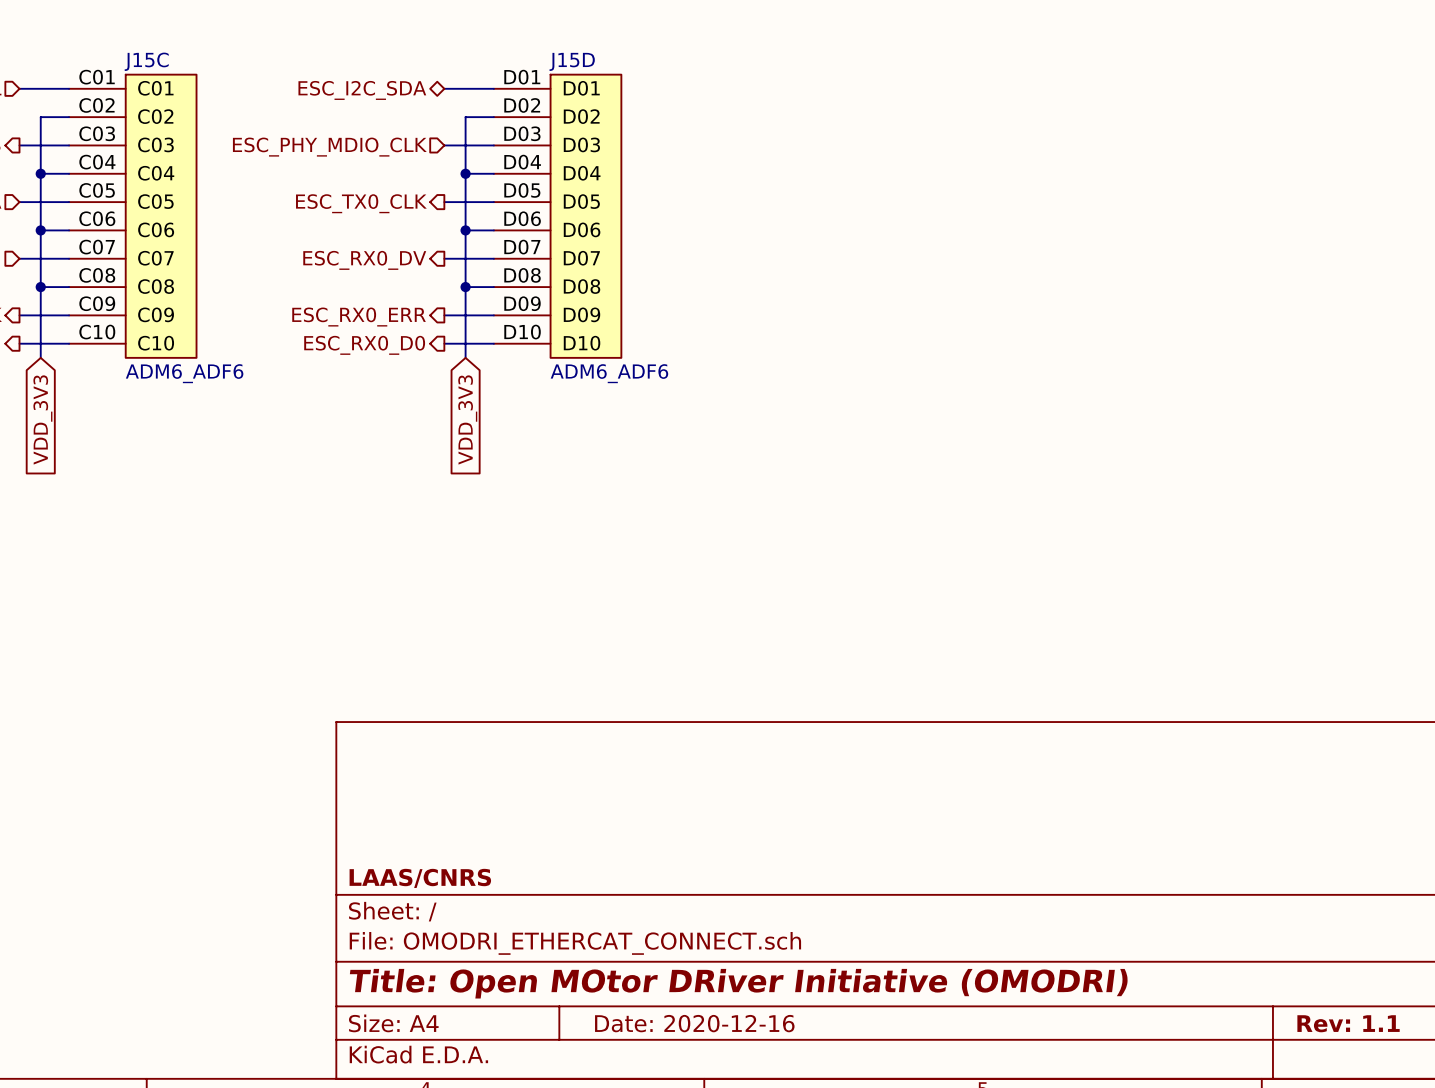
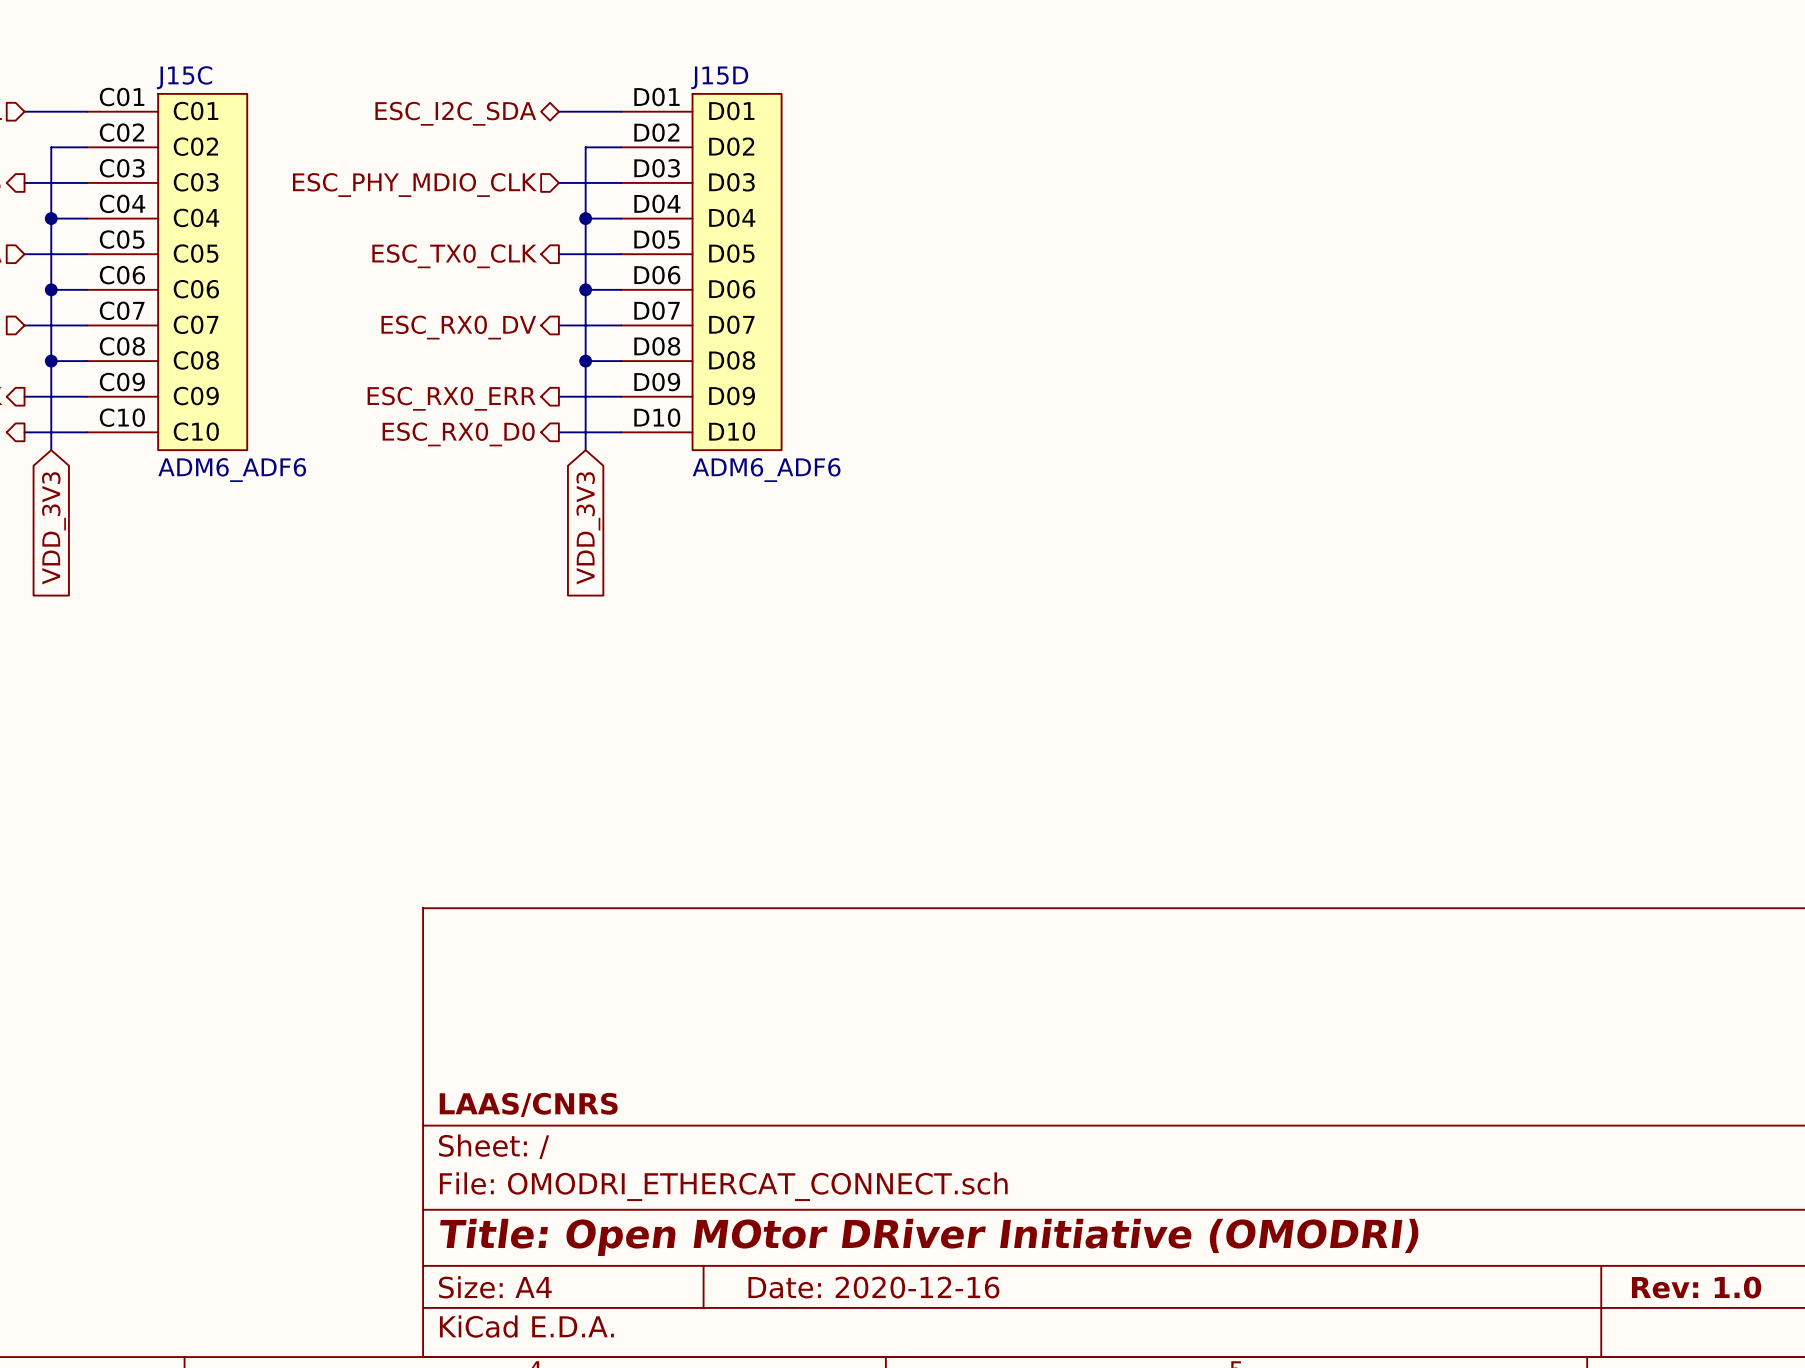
title block: Rev: 1.1 (1348, 1023) -> Rev: 1.0 (1696, 1287)

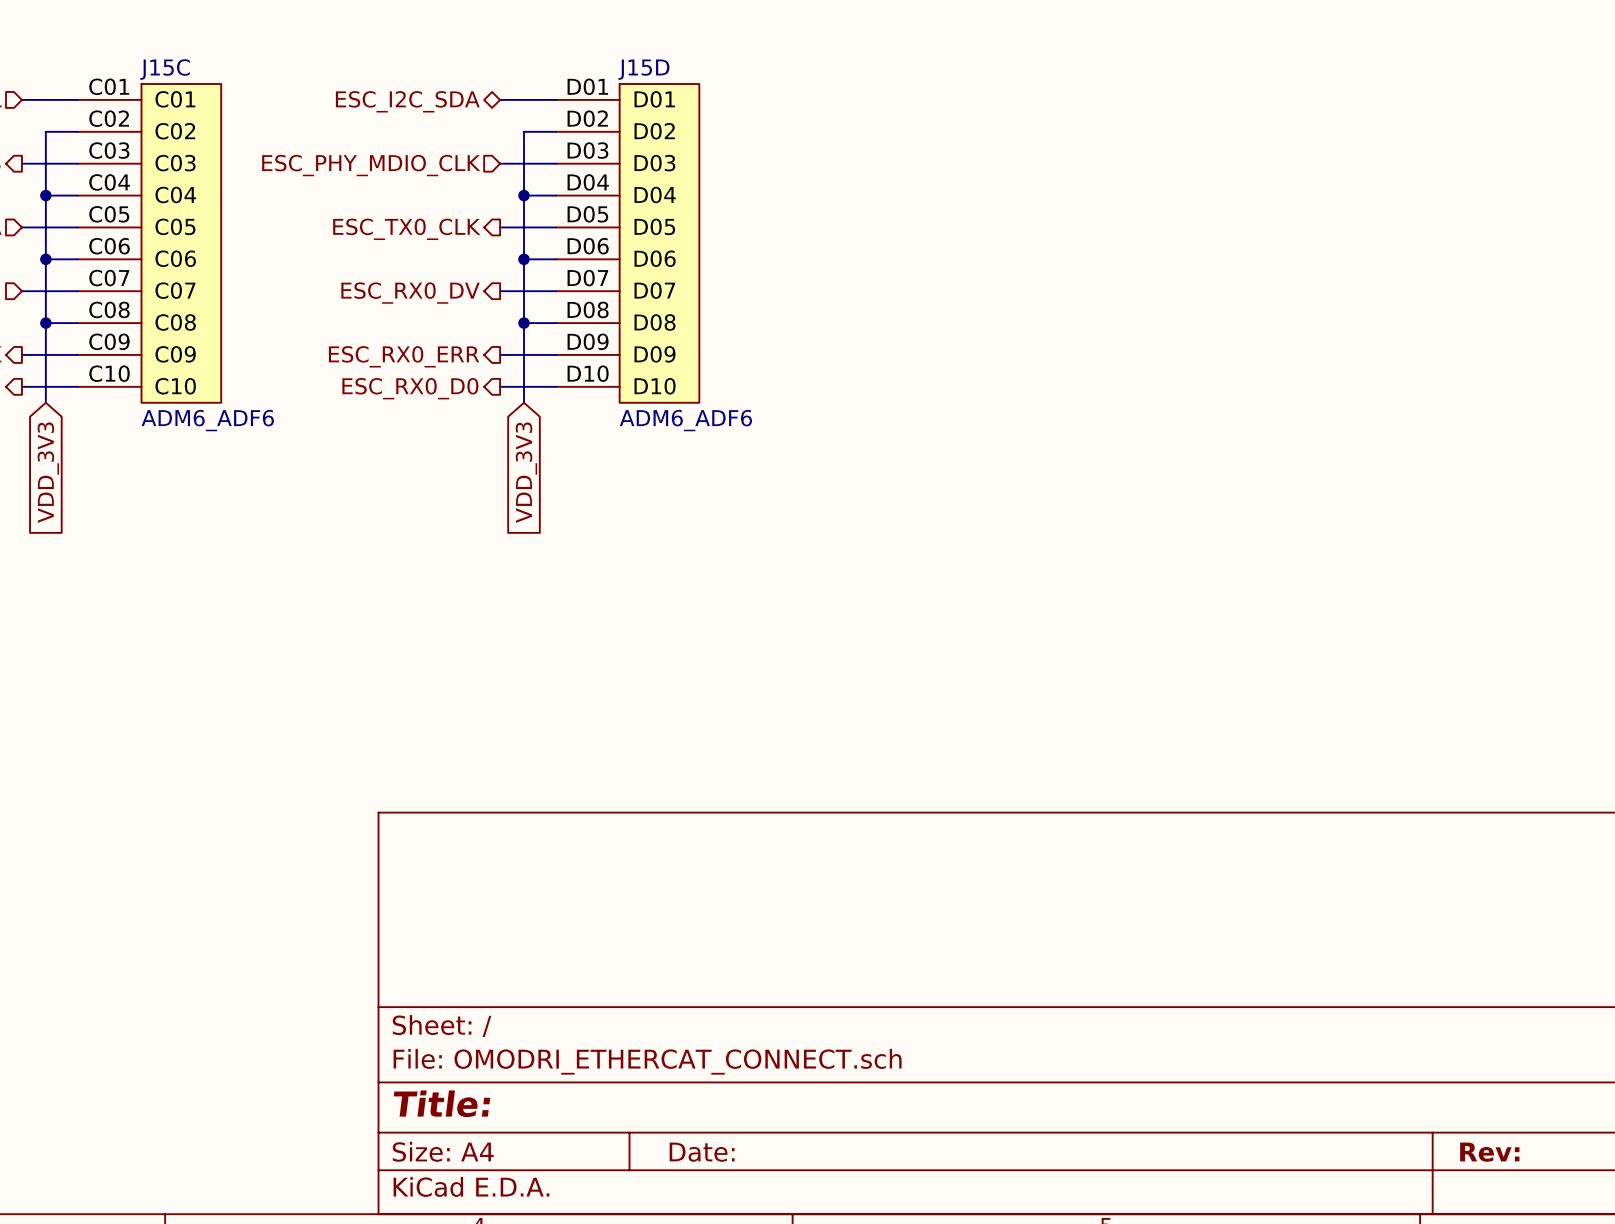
title block: LAAS/CNRS (528, 1104) -> none
title block: Title: Open MOtor DRiver Initiative (OMODRI) (929, 1237) -> Title: (441, 1103)
title block: Date: 2020-12-16 (873, 1287) -> Date: (702, 1152)
title block: Rev: 1.0 (1696, 1287) -> Rev: (1489, 1152)

